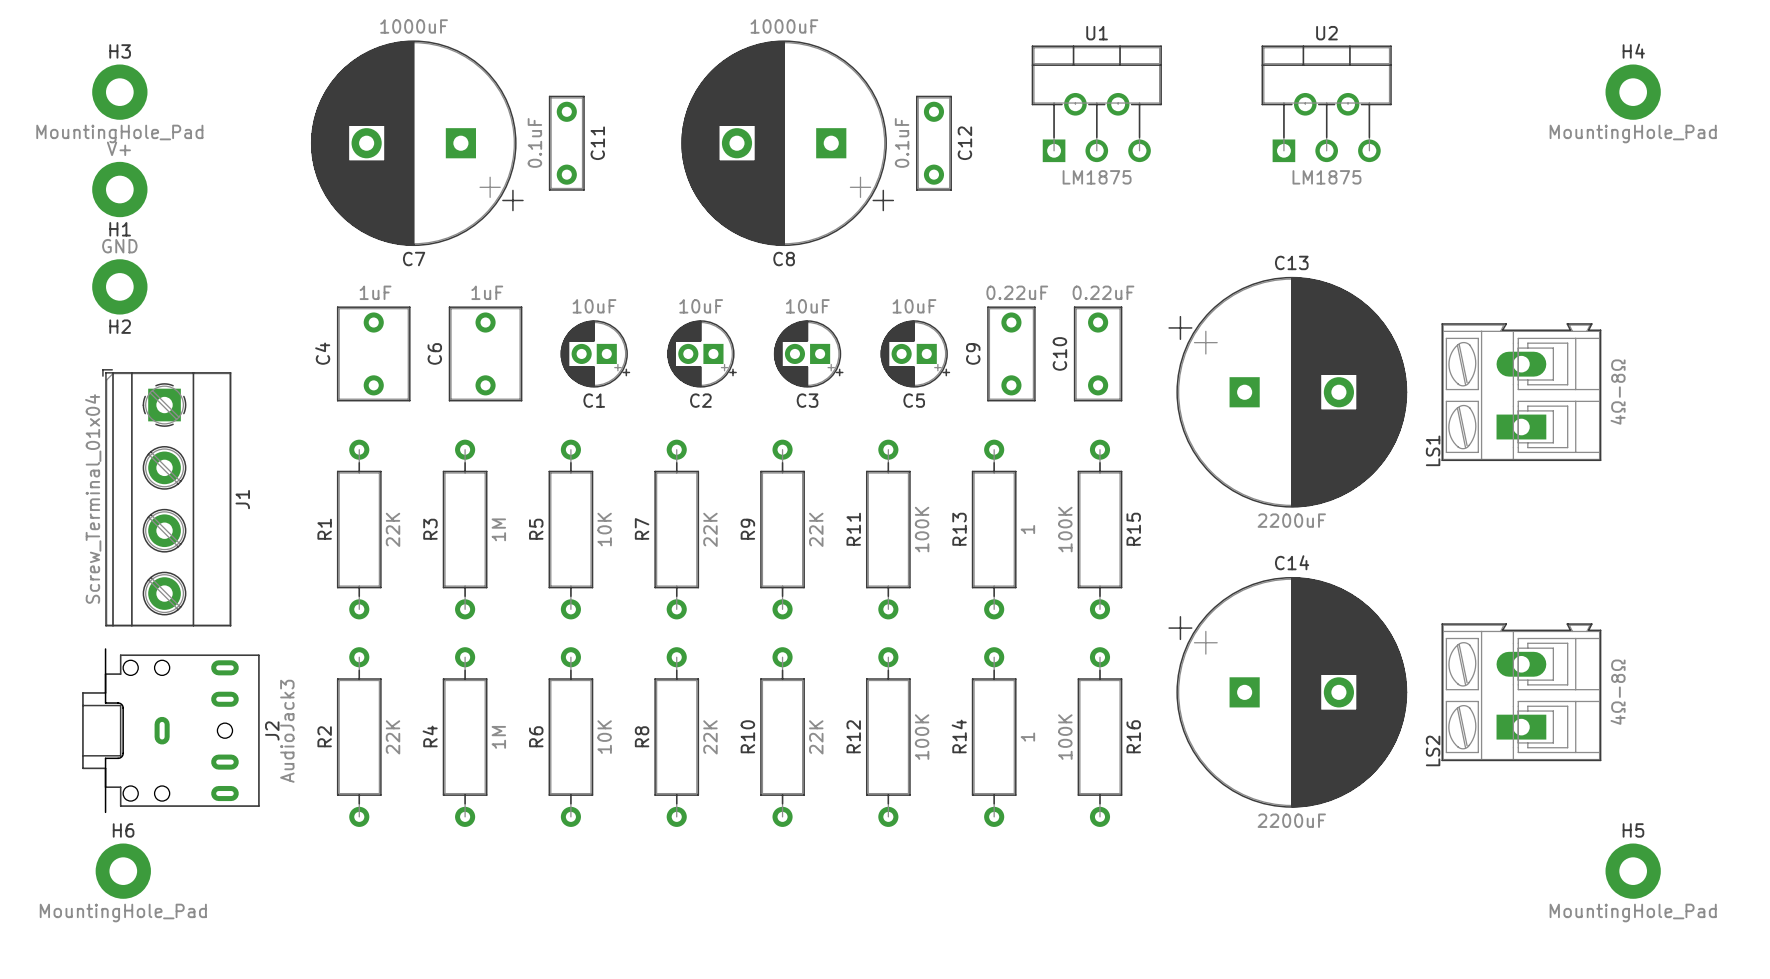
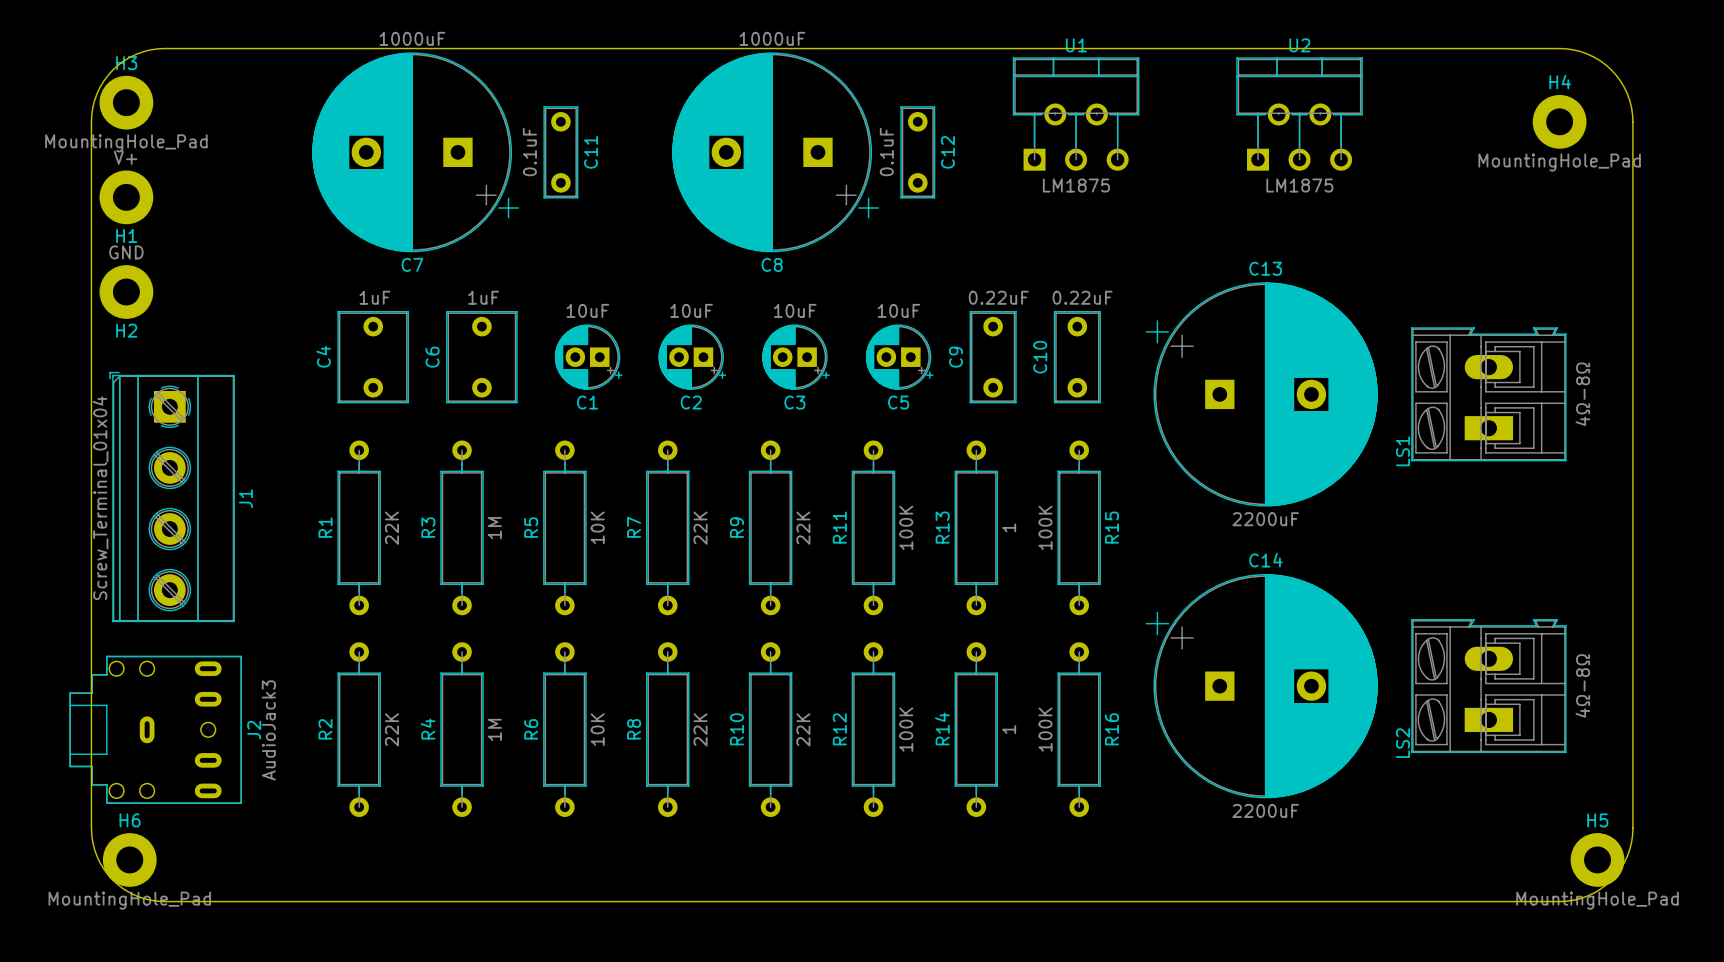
board edge: none -> (164, 48) (1559, 48) (1573, 49) (1594, 57) (1606, 65) (1620, 81) (1629, 100) (1632, 121) (1632, 828) (1631, 842) (1624, 862) (1611, 880) (1594, 892) (1573, 900) (1559, 901) (164, 901) (150, 900) (130, 892) (112, 880) (103, 869) (94, 849) (91, 835) (91, 121) (97, 93) (112, 70) (136, 54) (164, 48)
H4 position: (1633, 92) -> (1559, 121)
J2 footprint: [82, 648, 260, 814] -> [69, 655, 242, 804]

